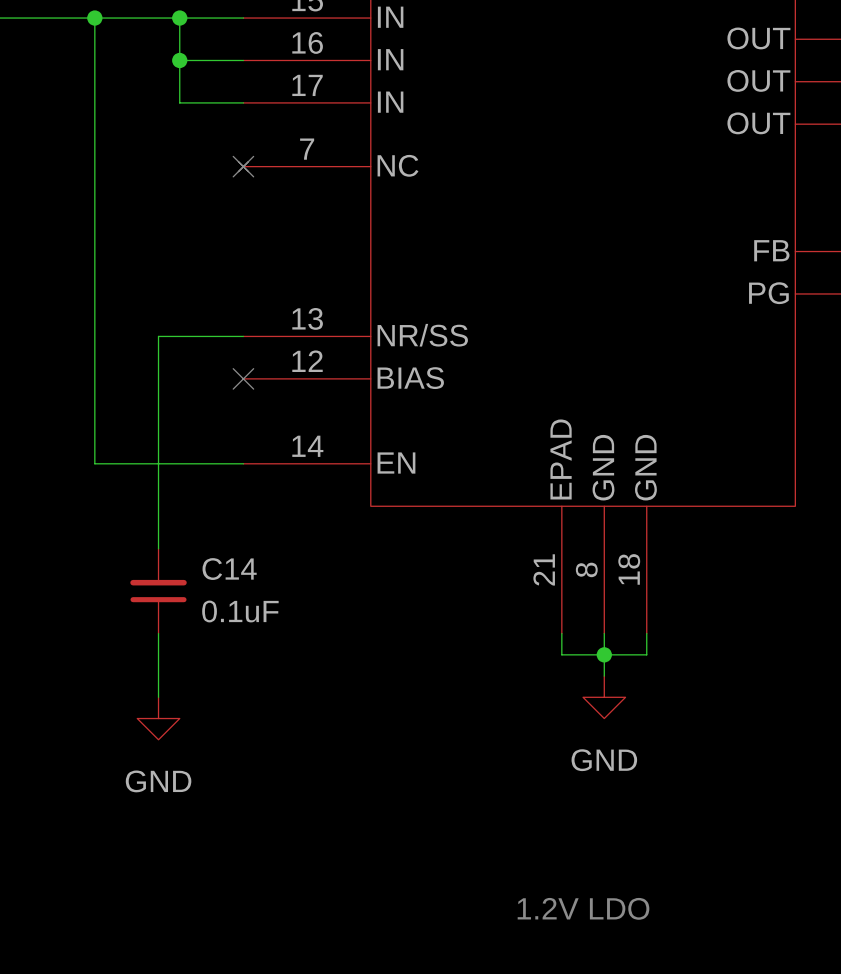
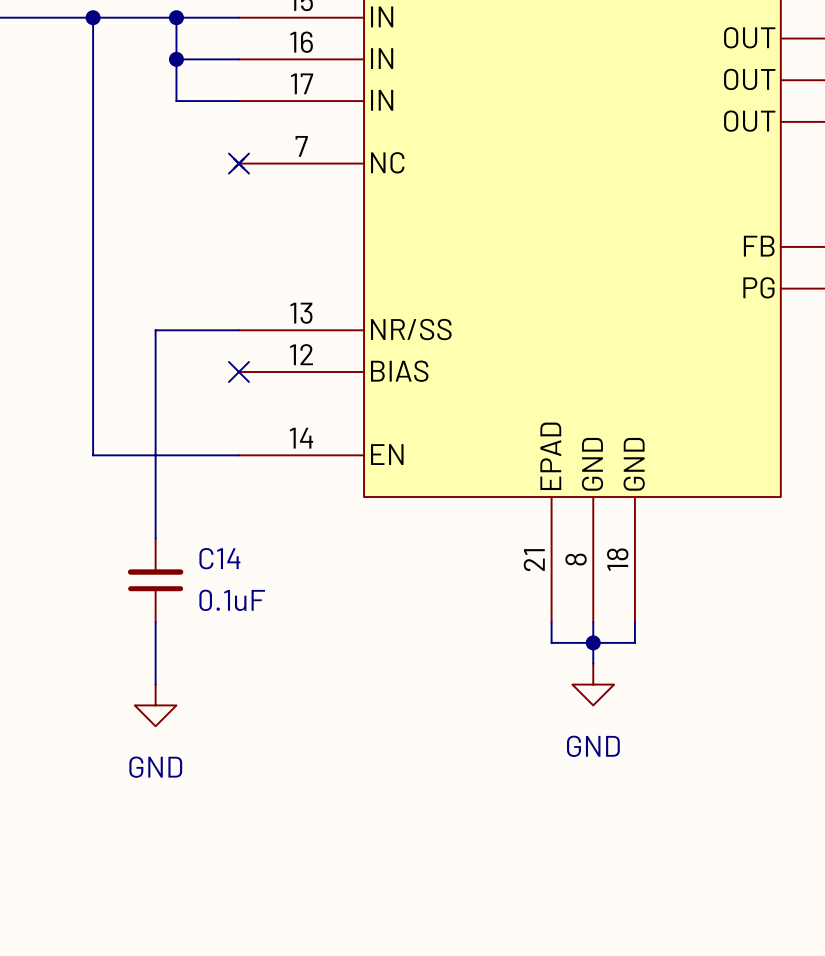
text: 1.2V LDO (583, 908) -> none

